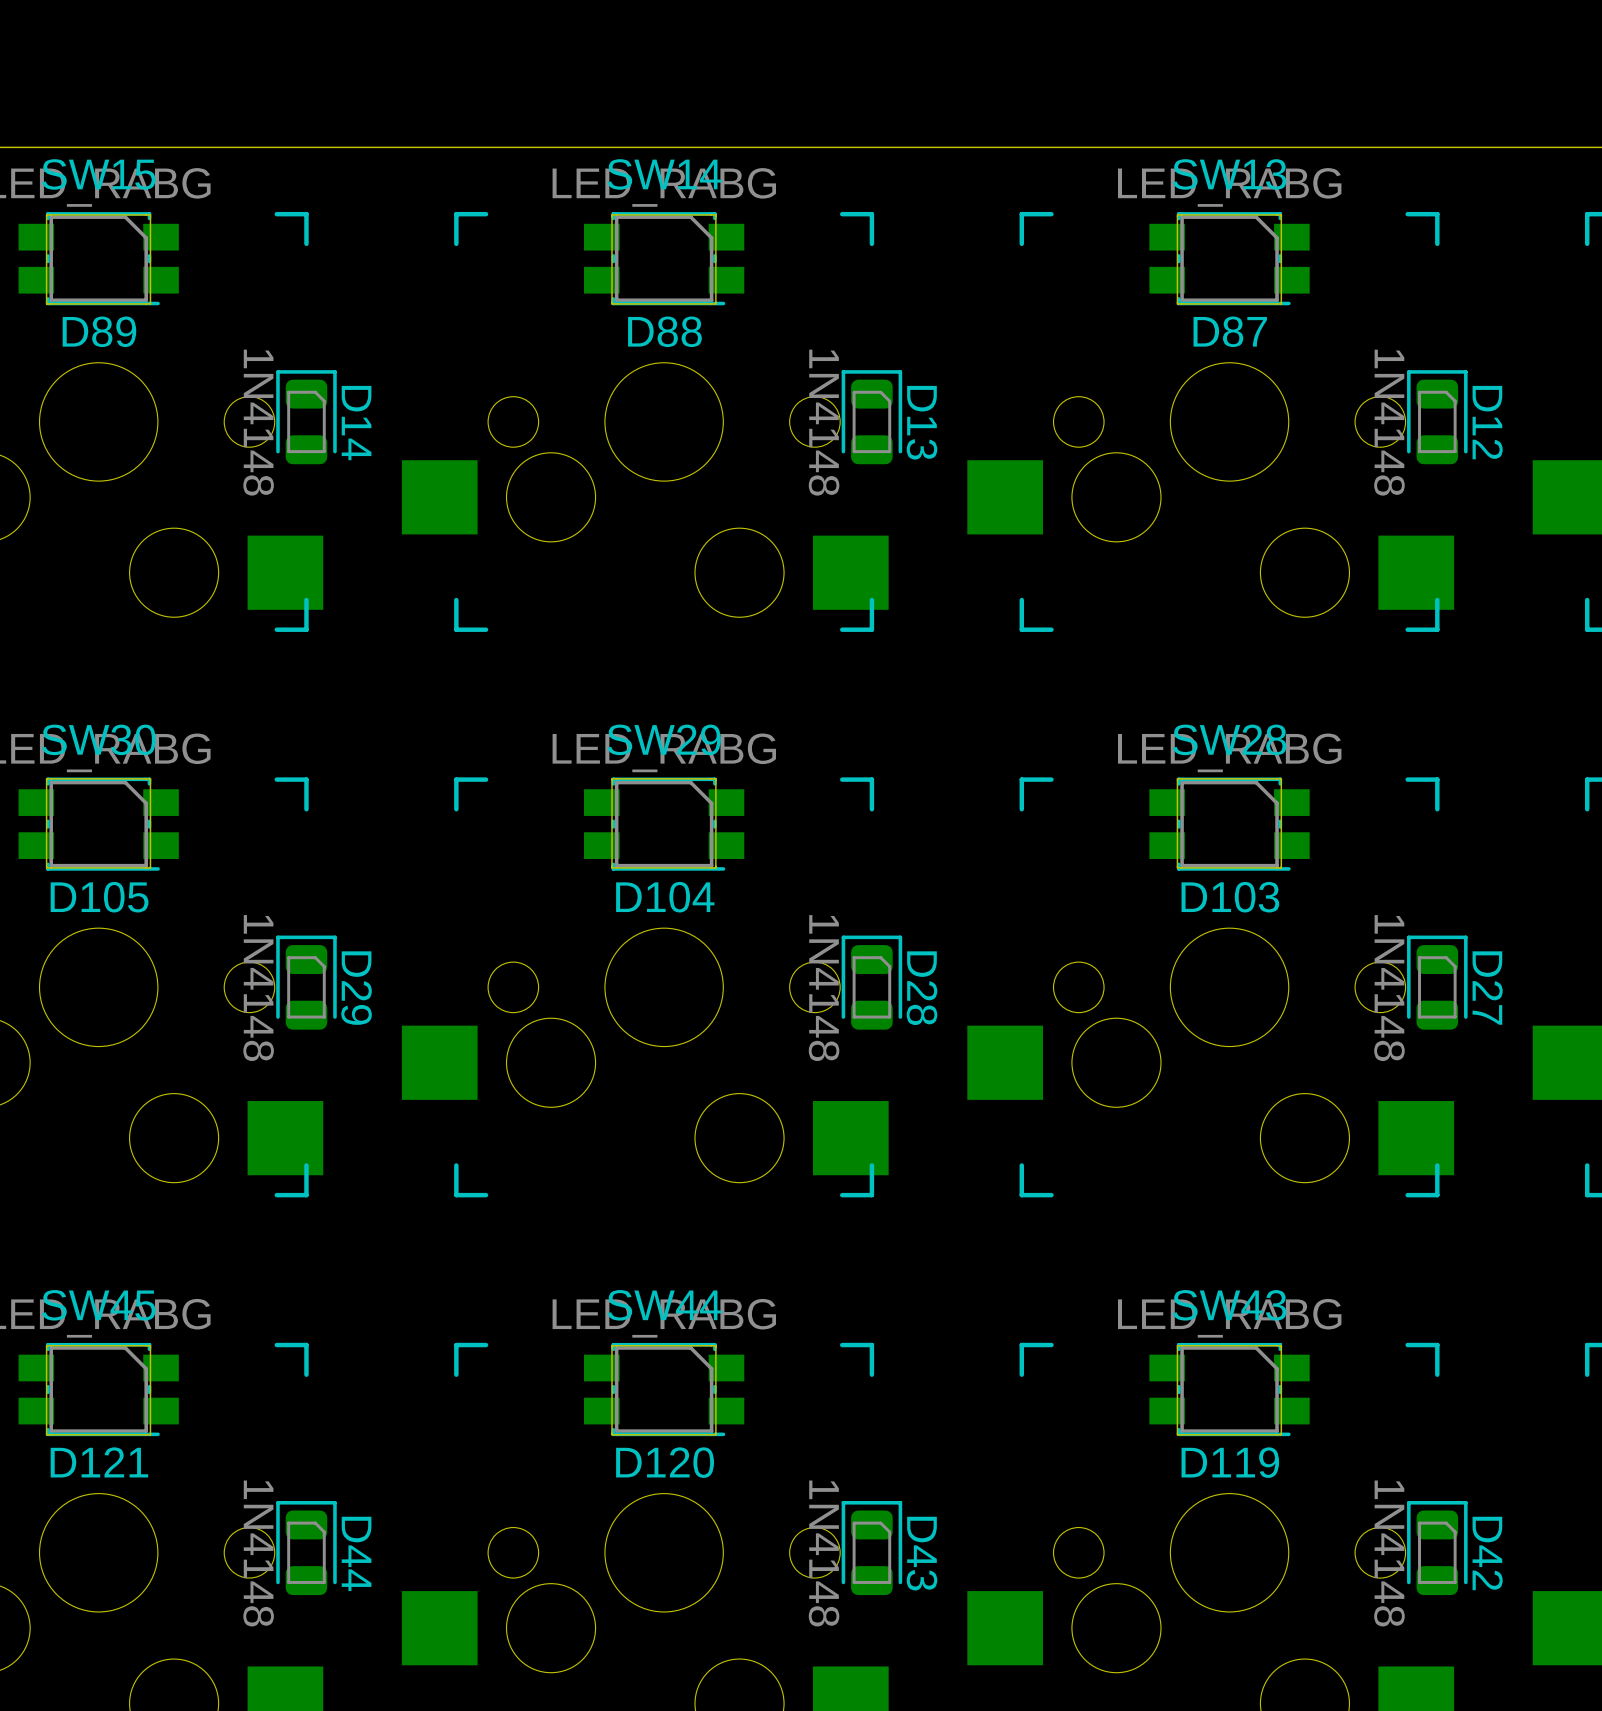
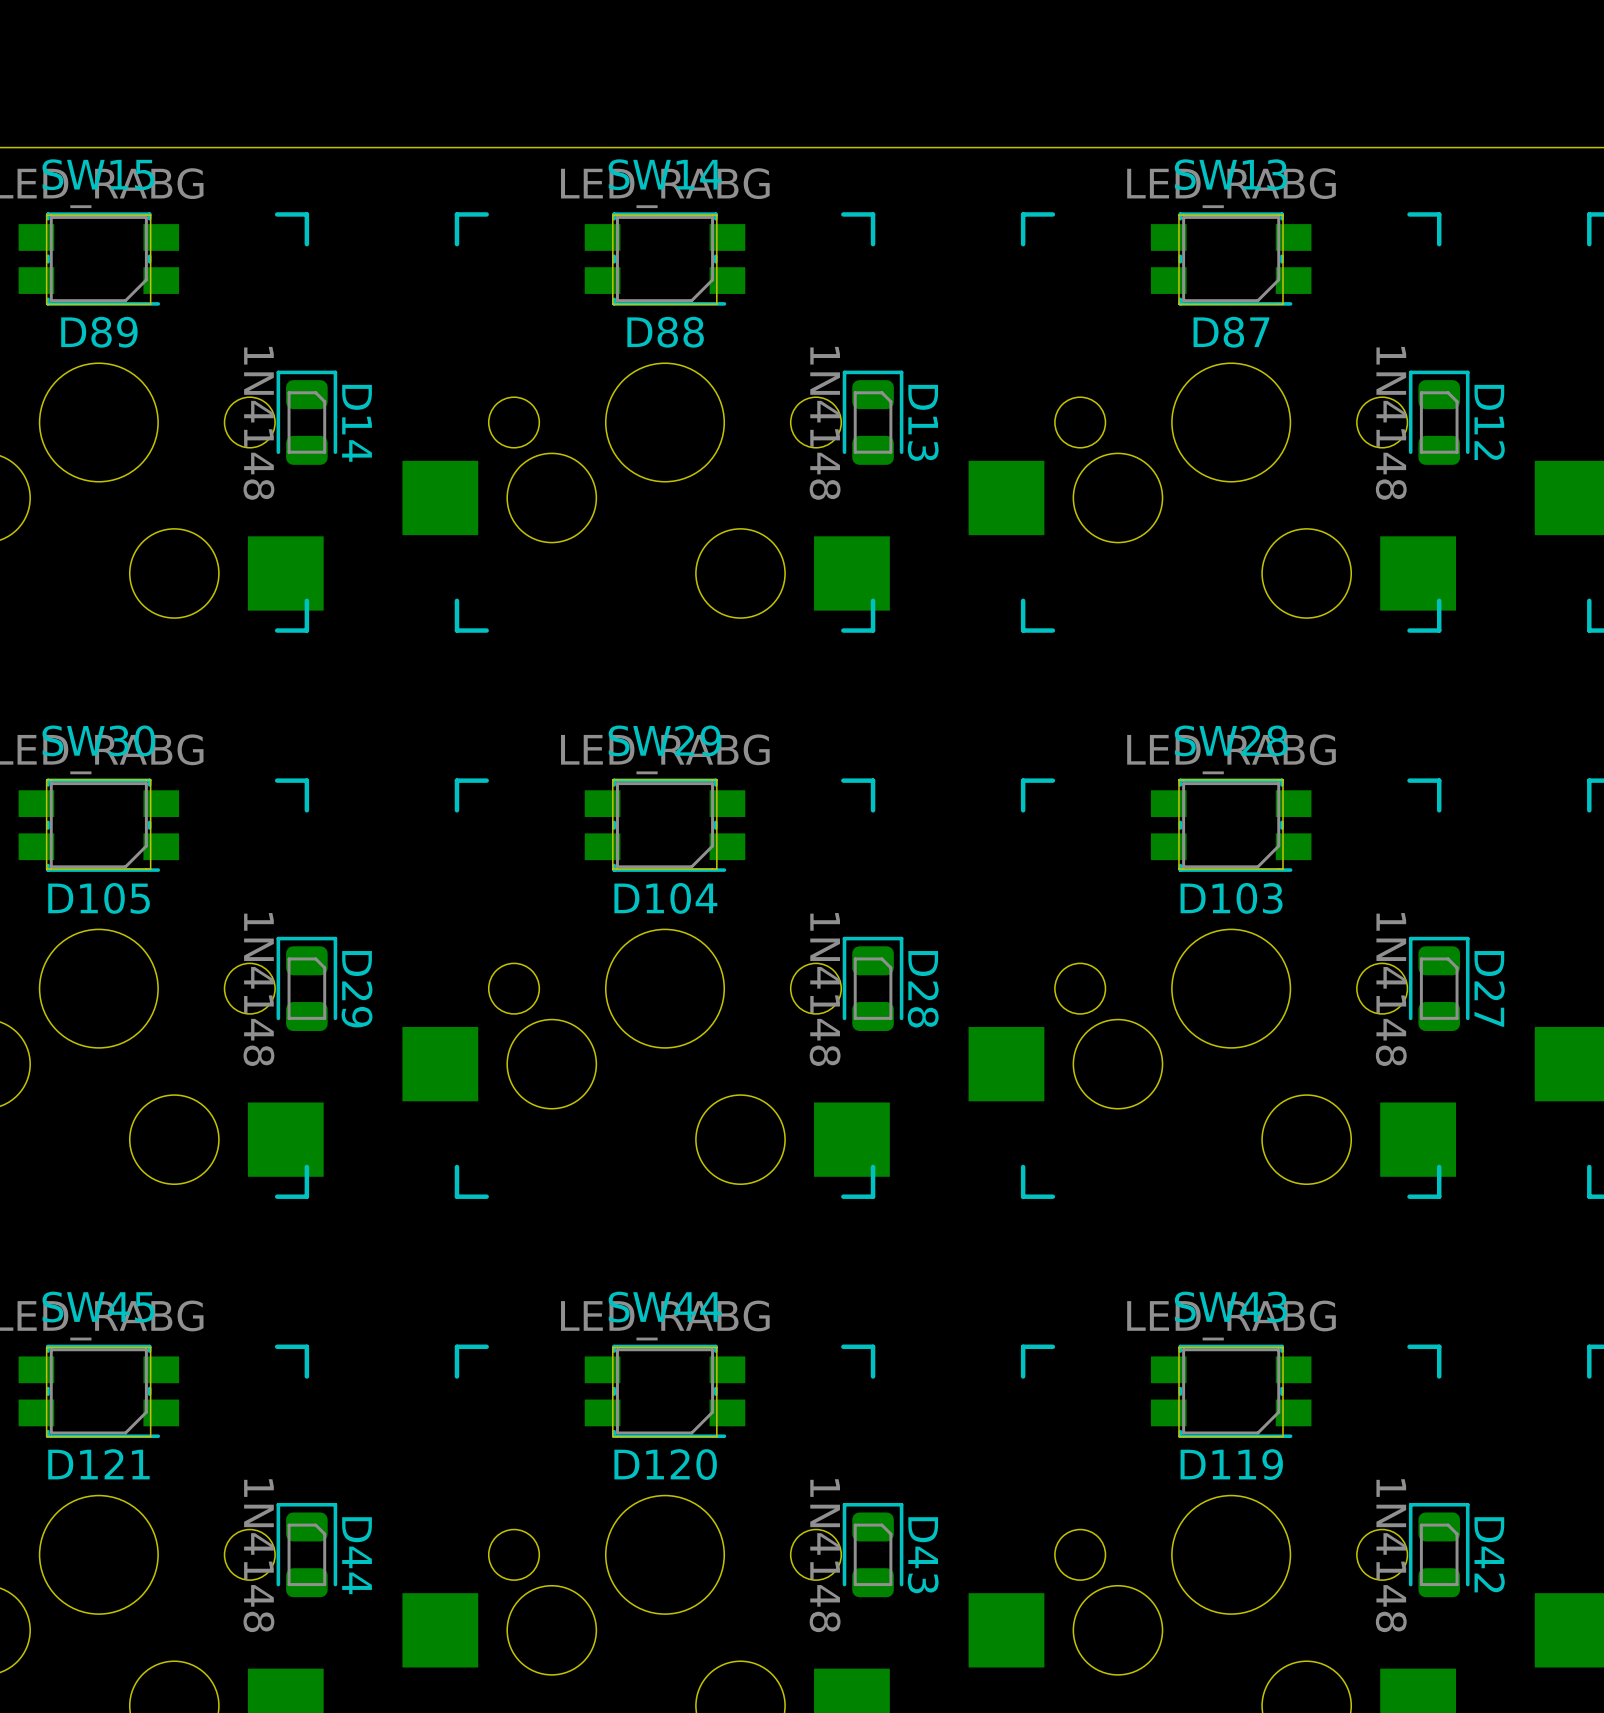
D89 footprint: [18, 212, 179, 306] -> [18, 212, 180, 306]
D88 footprint: [583, 212, 745, 306] -> [584, 212, 746, 306]
D87 footprint: [1149, 212, 1310, 306] -> [1150, 212, 1312, 306]
D105 footprint: [18, 777, 179, 871] -> [18, 778, 180, 872]
D104 footprint: [583, 777, 745, 871] -> [584, 778, 746, 872]
D103 footprint: [1149, 777, 1310, 871] -> [1150, 778, 1312, 872]
D121 footprint: [18, 1342, 179, 1437] -> [18, 1344, 180, 1439]
D120 footprint: [583, 1342, 745, 1437] -> [584, 1344, 746, 1439]
D119 footprint: [1149, 1342, 1310, 1437] -> [1150, 1344, 1312, 1439]

